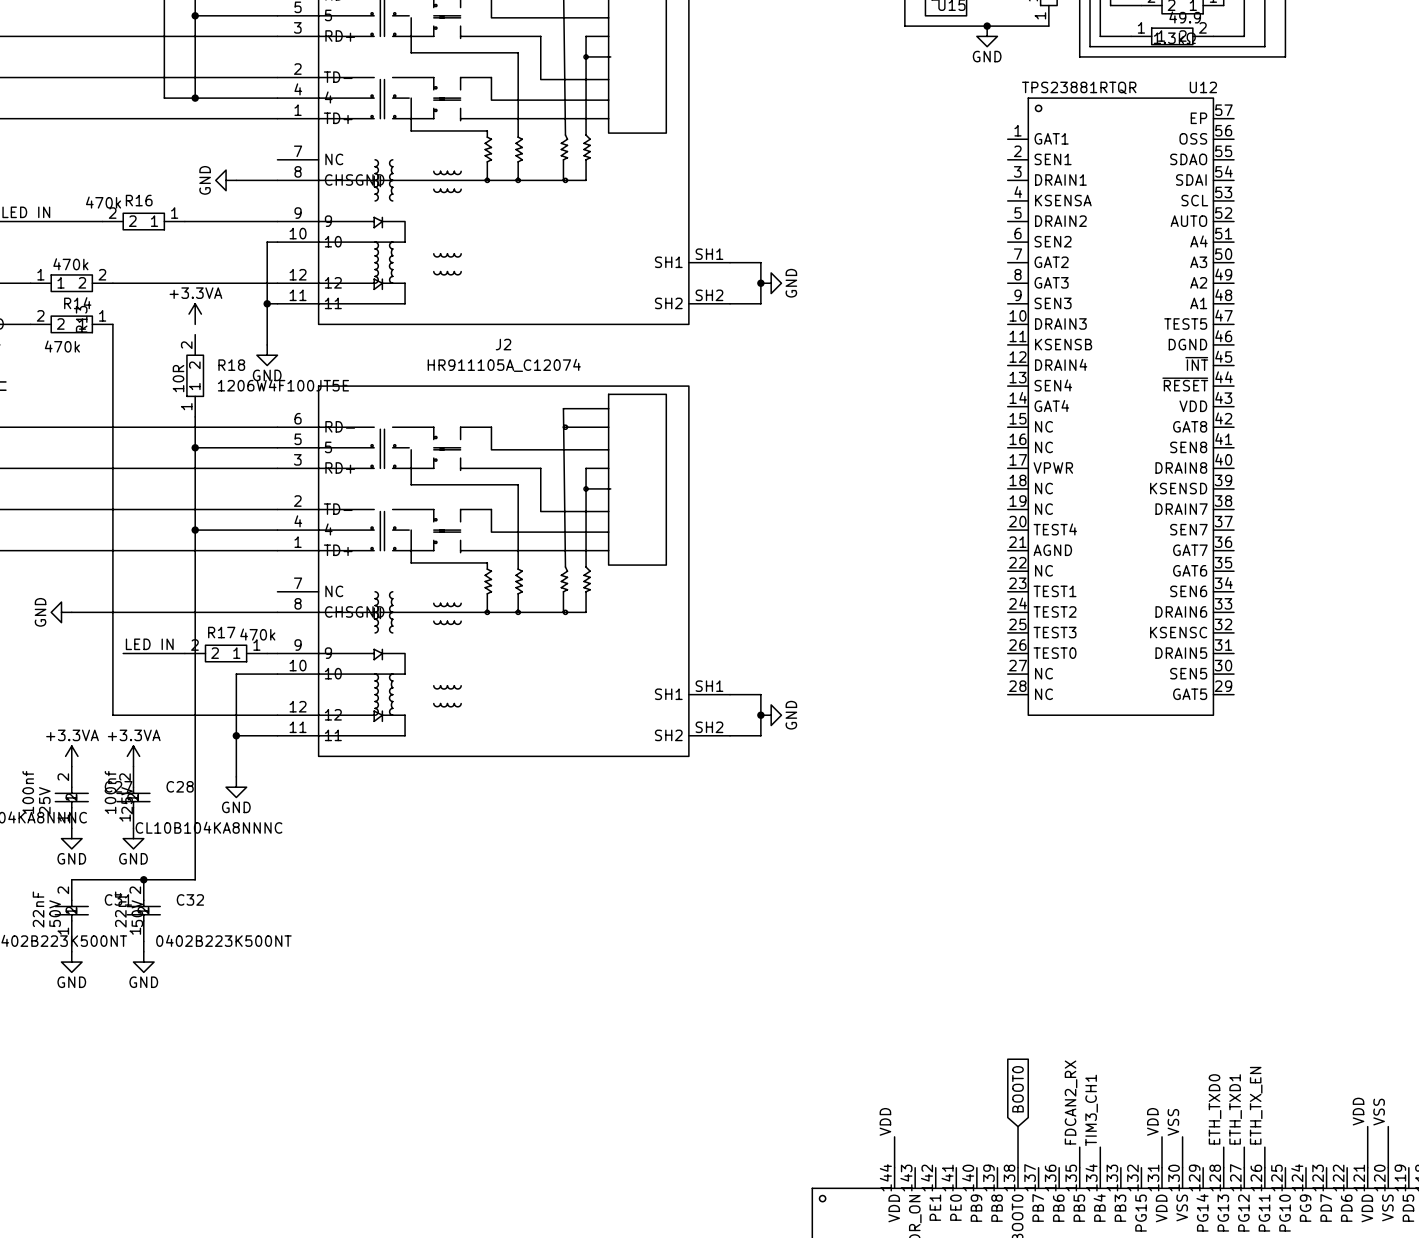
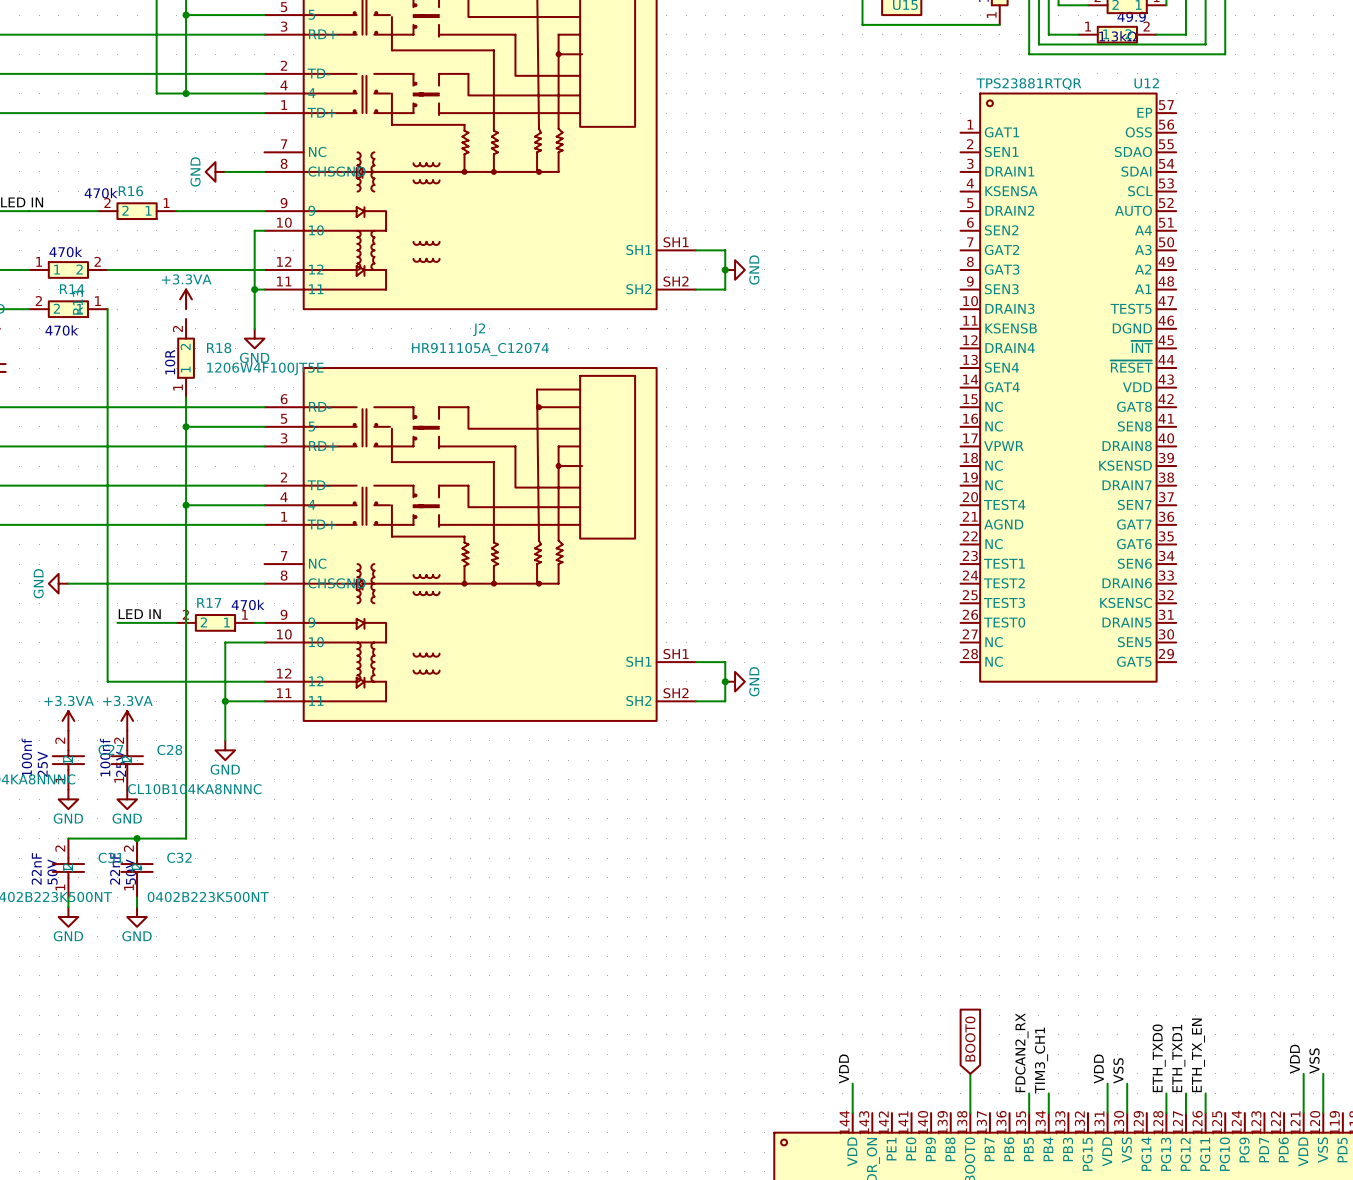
junction: (987, 26) -> none
power symbol: GND (987, 36) -> none

